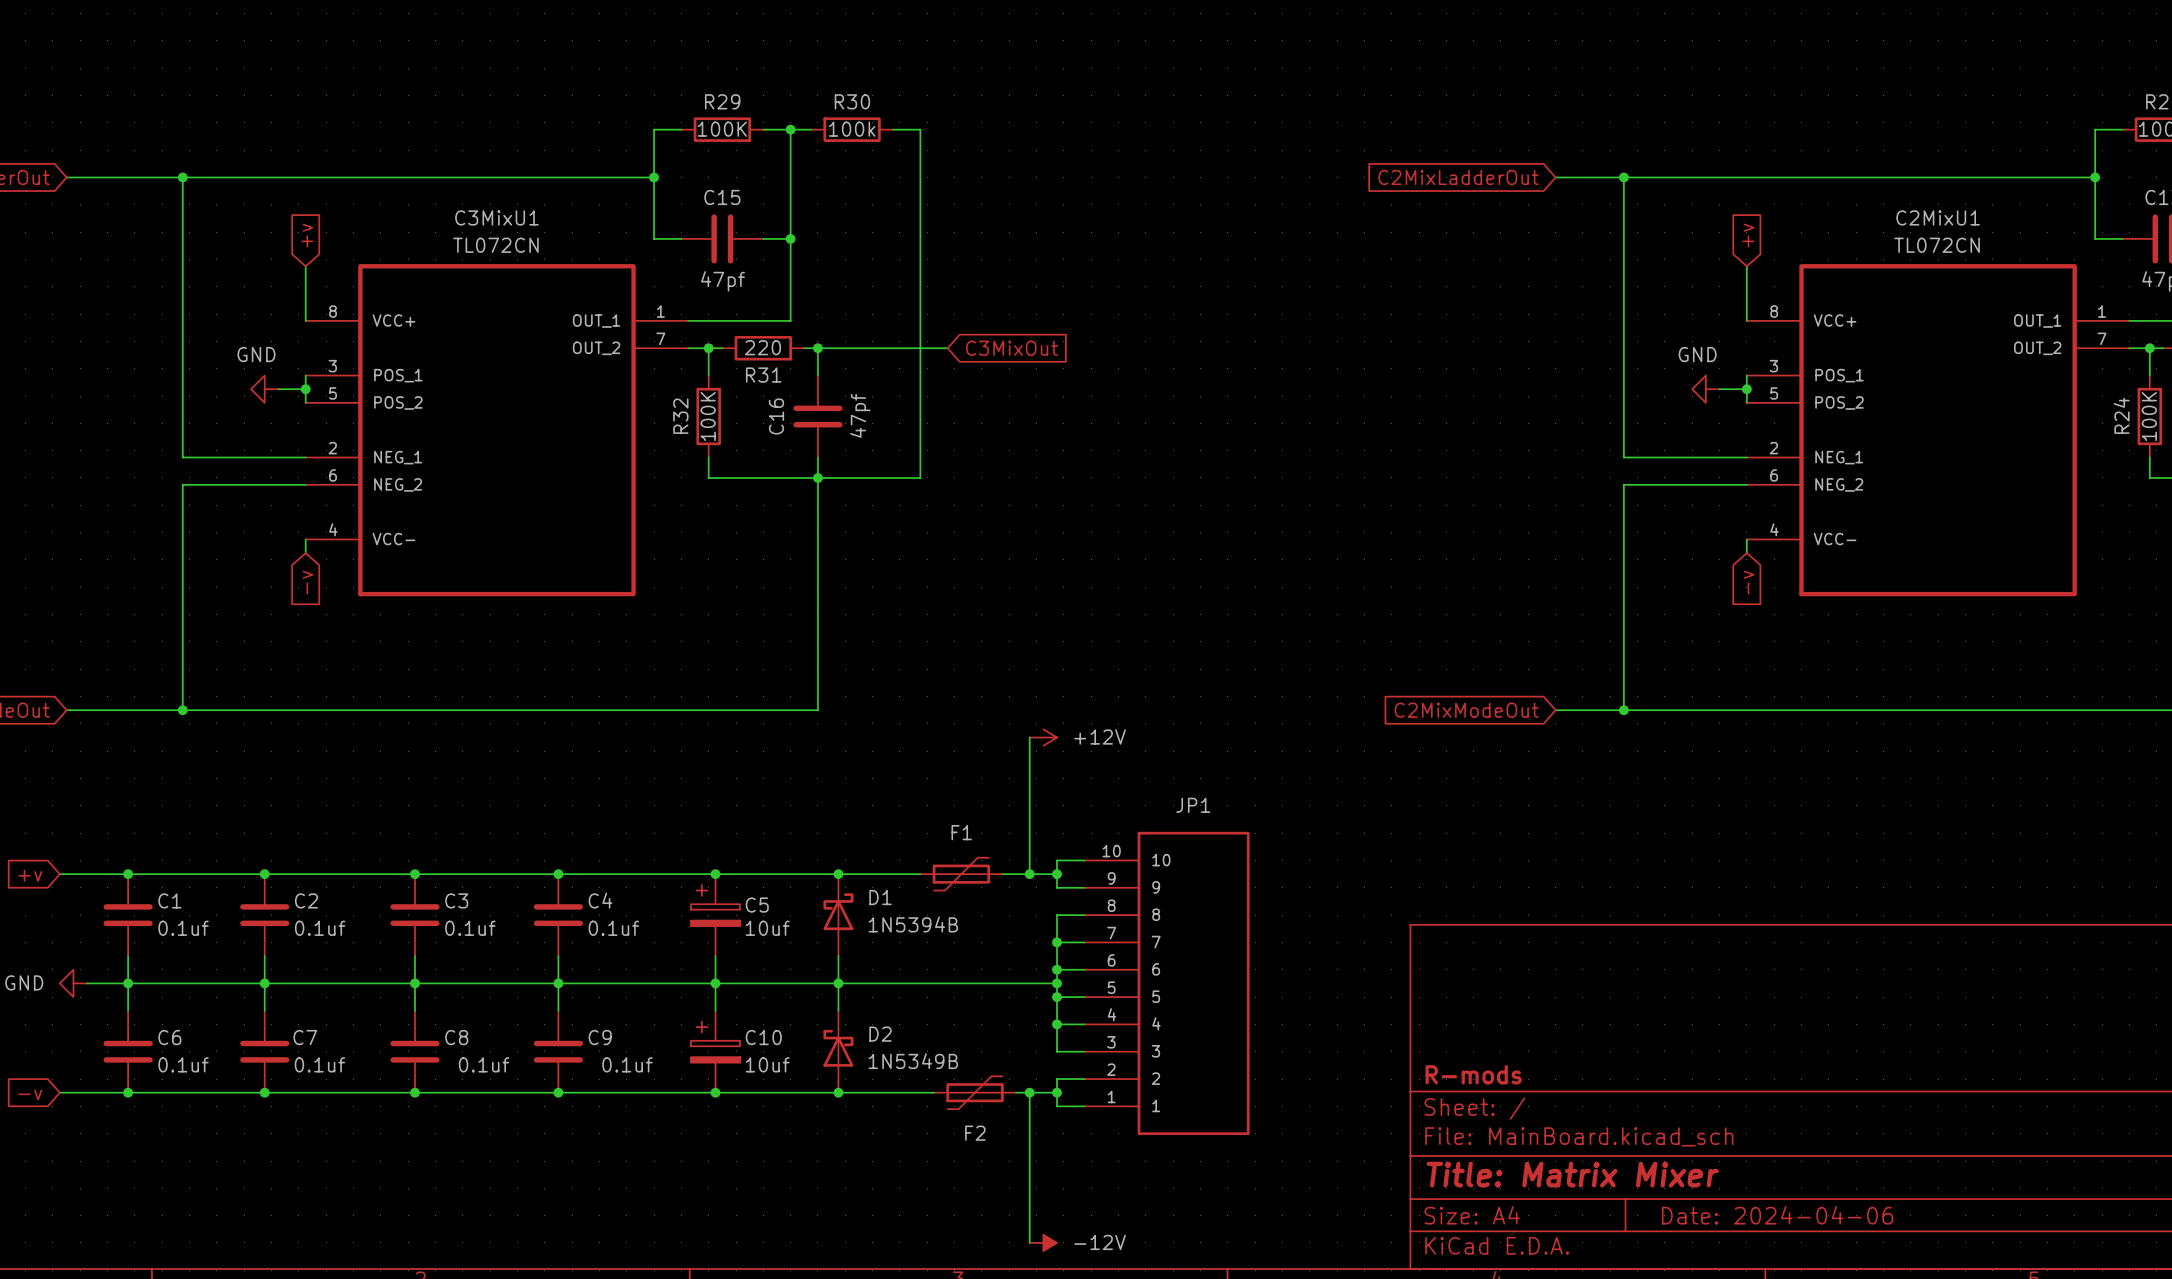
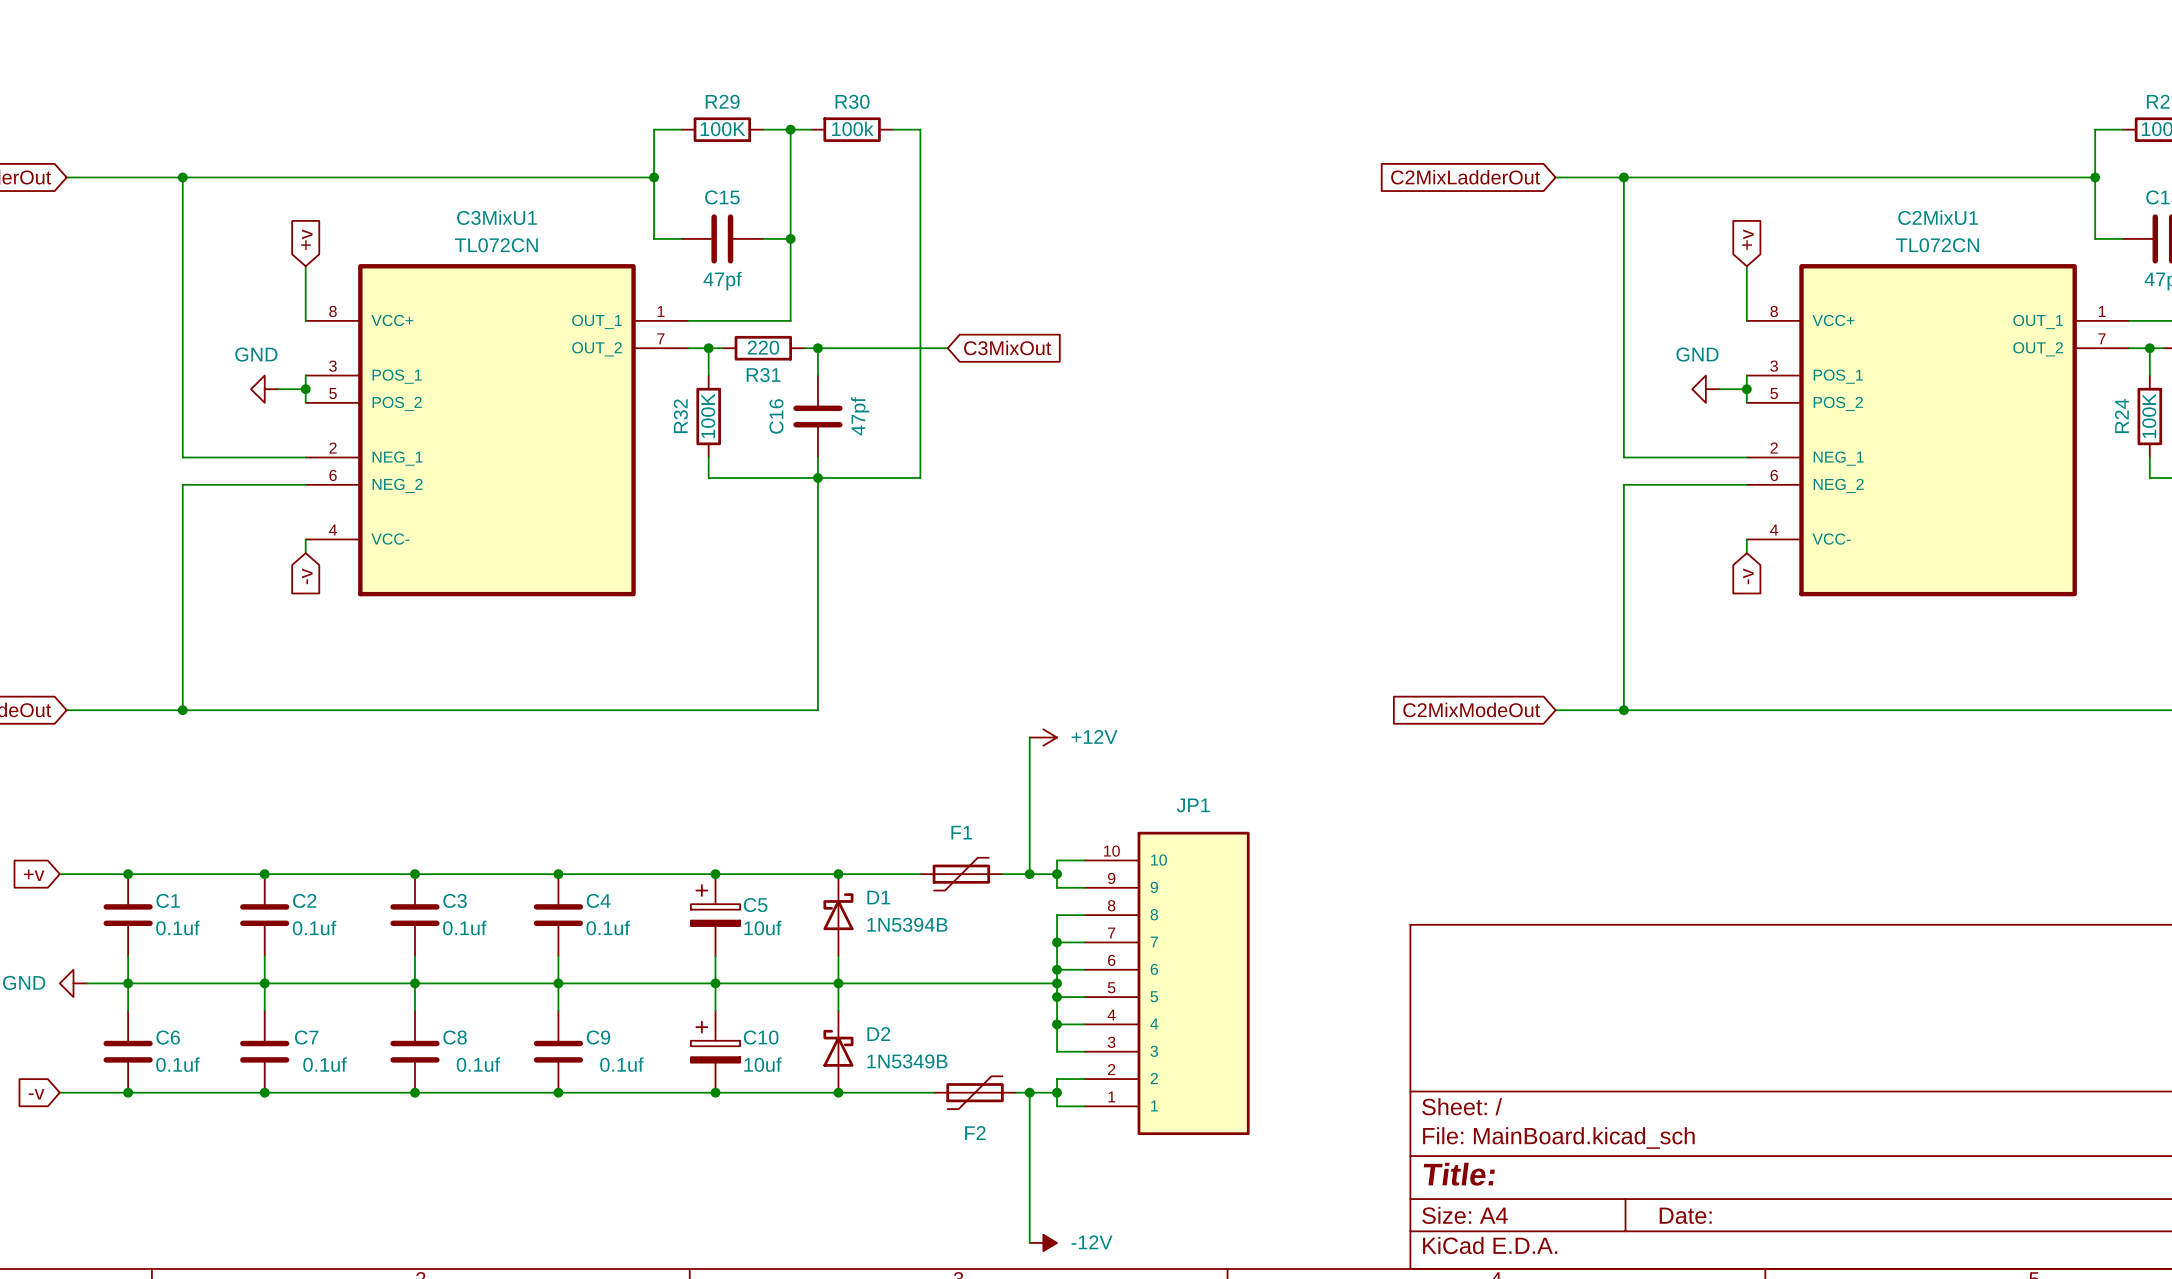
title block: R-mods (1473, 1074) -> none
title block: Title: Matrix Mixer (1572, 1174) -> Title: (1459, 1174)
title block: Date: 2024-04-06 (1777, 1215) -> Date: (1685, 1215)

